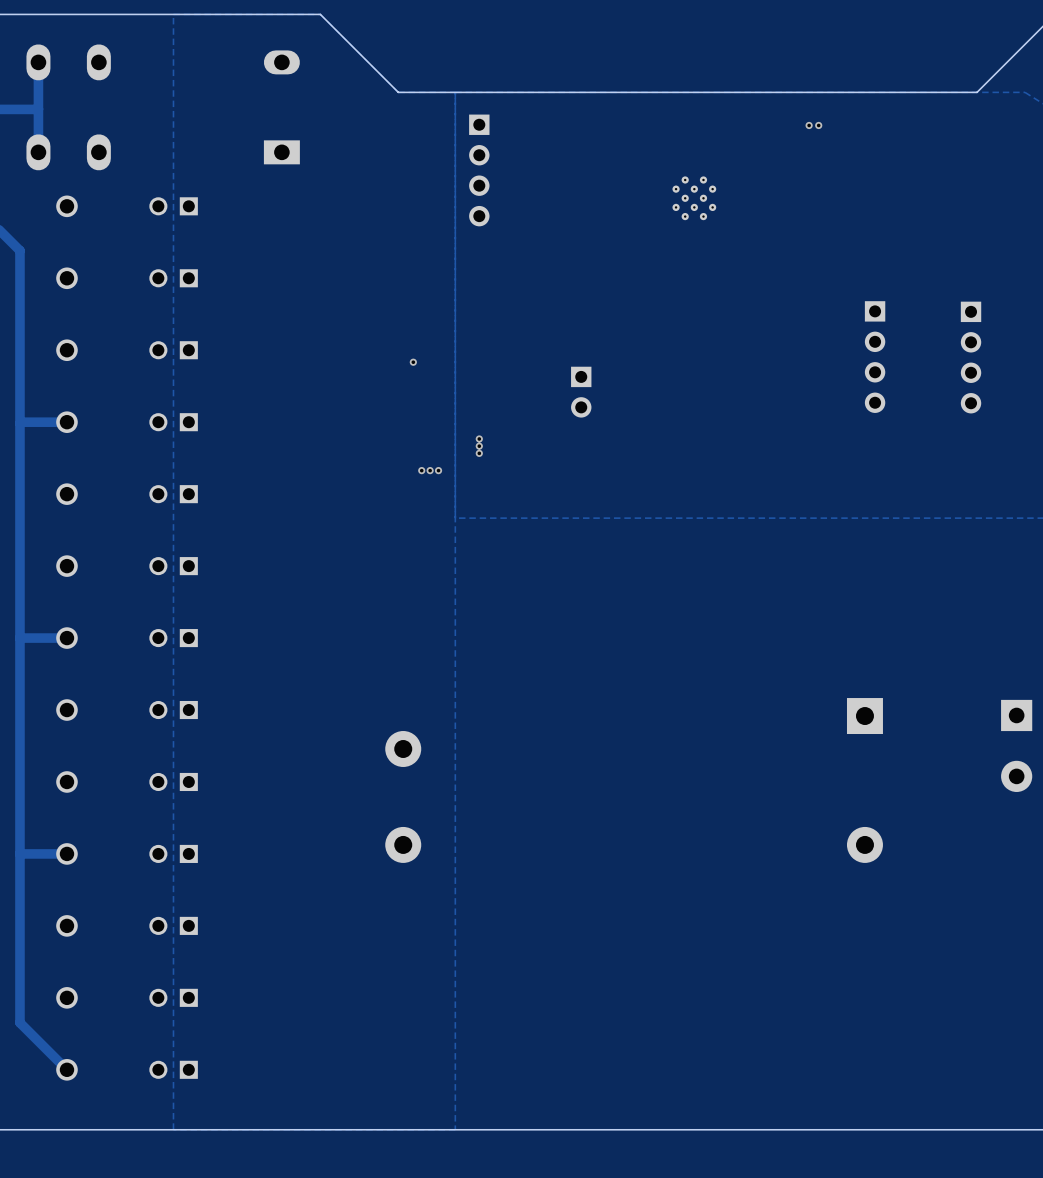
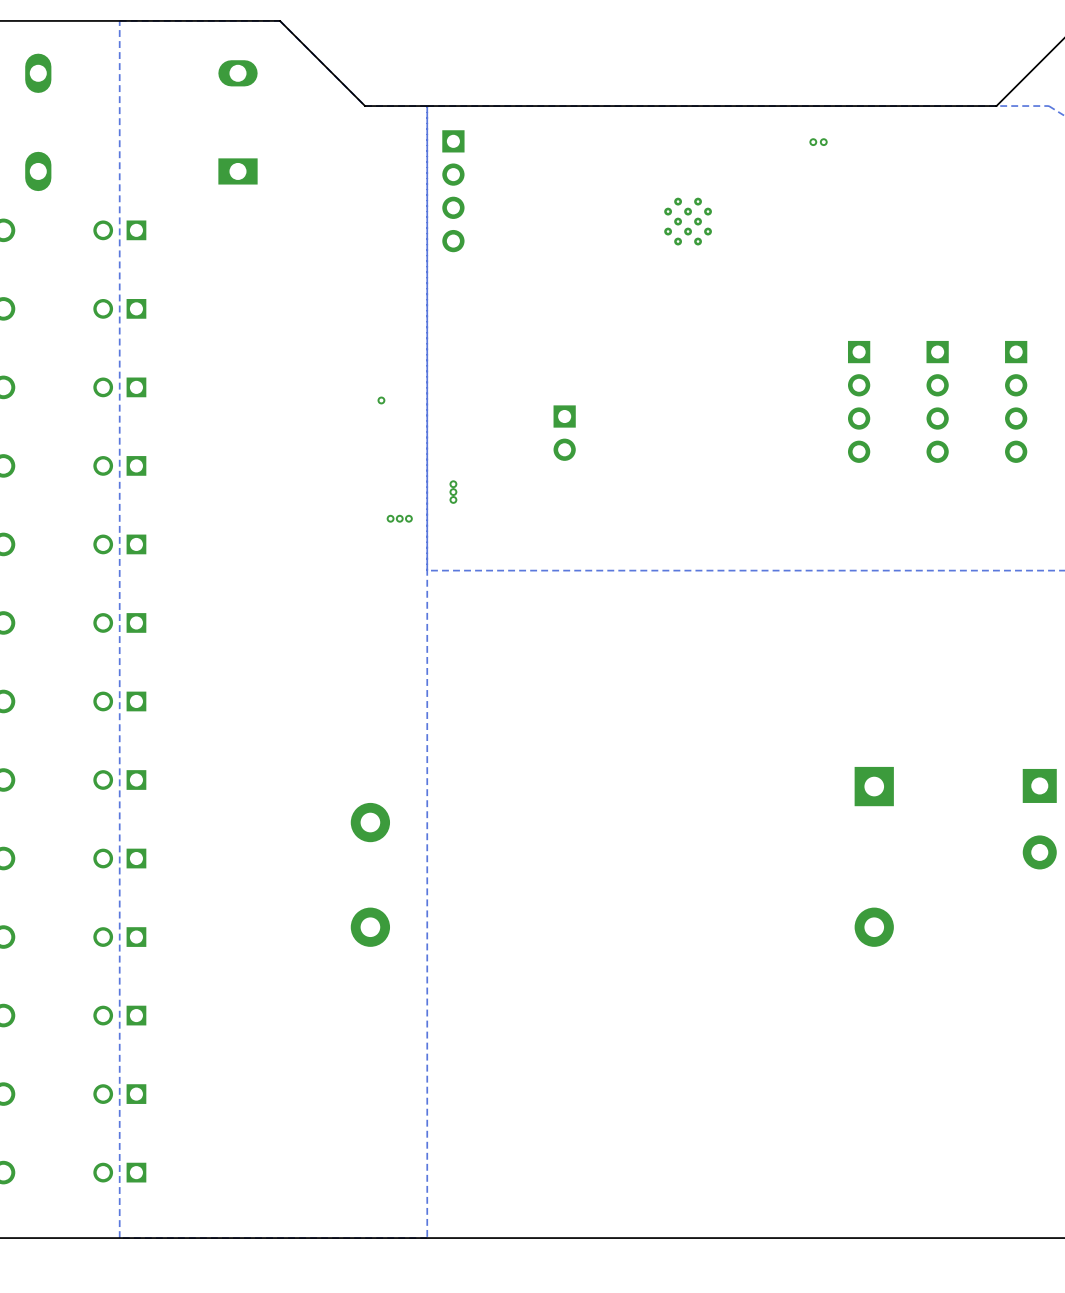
part: (875, 357) -> none
part: (971, 357) -> none
part: none -> (859, 401)
part: none -> (937, 401)
part: none -> (1016, 401)

